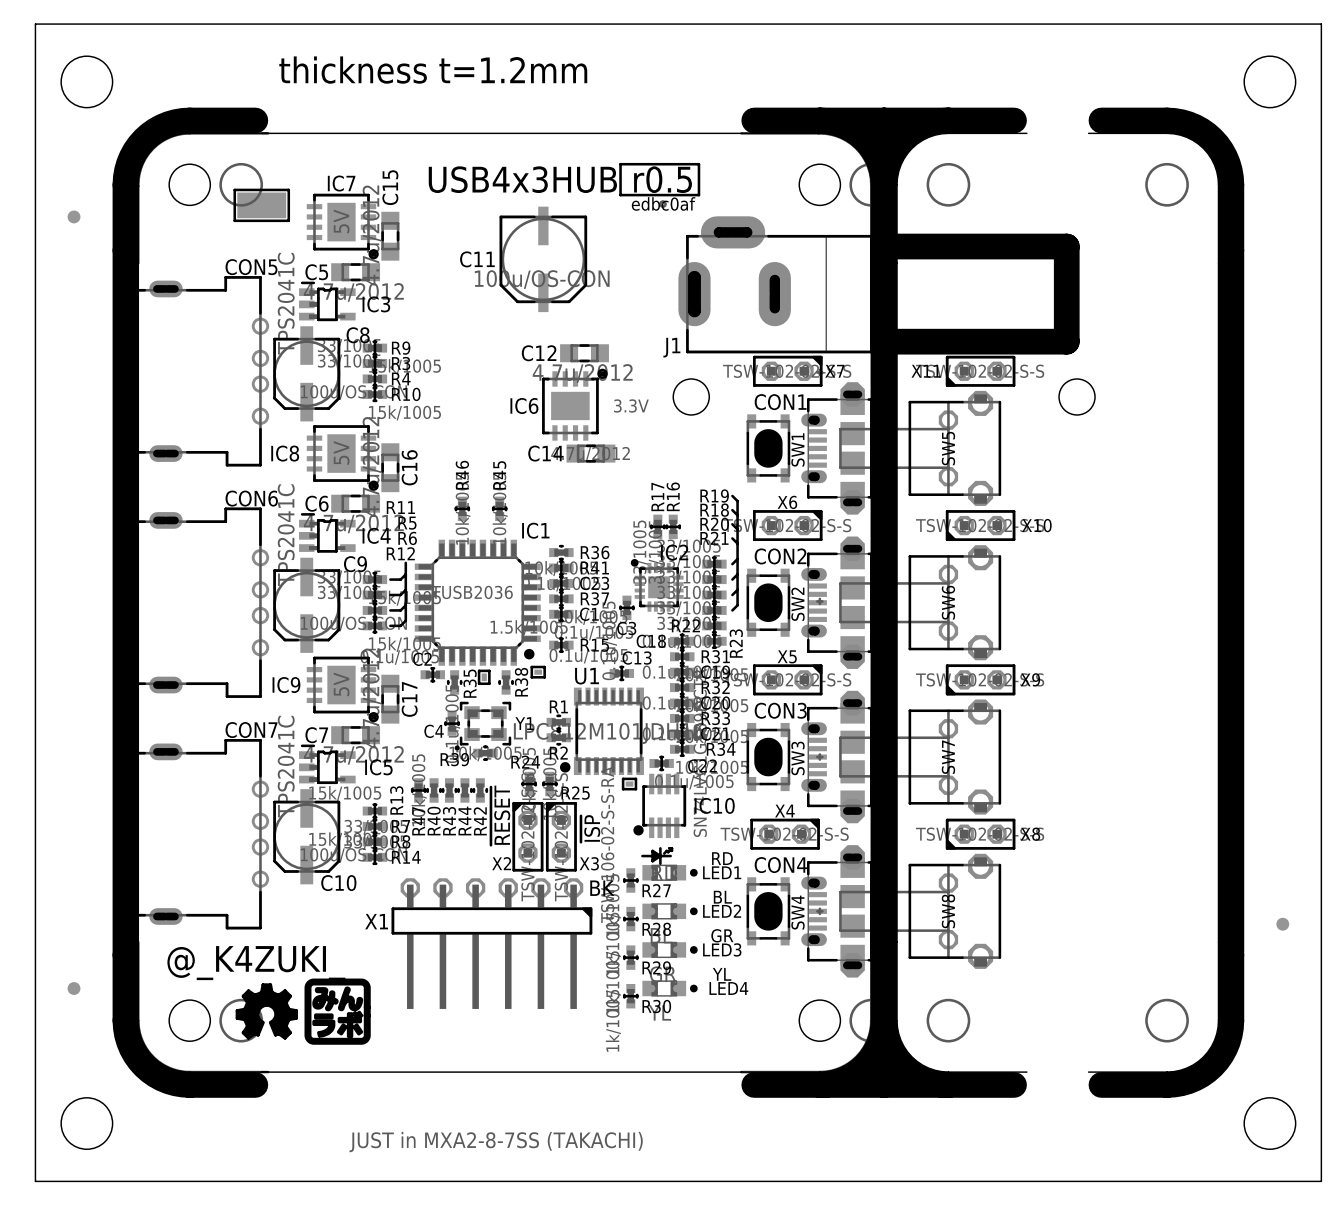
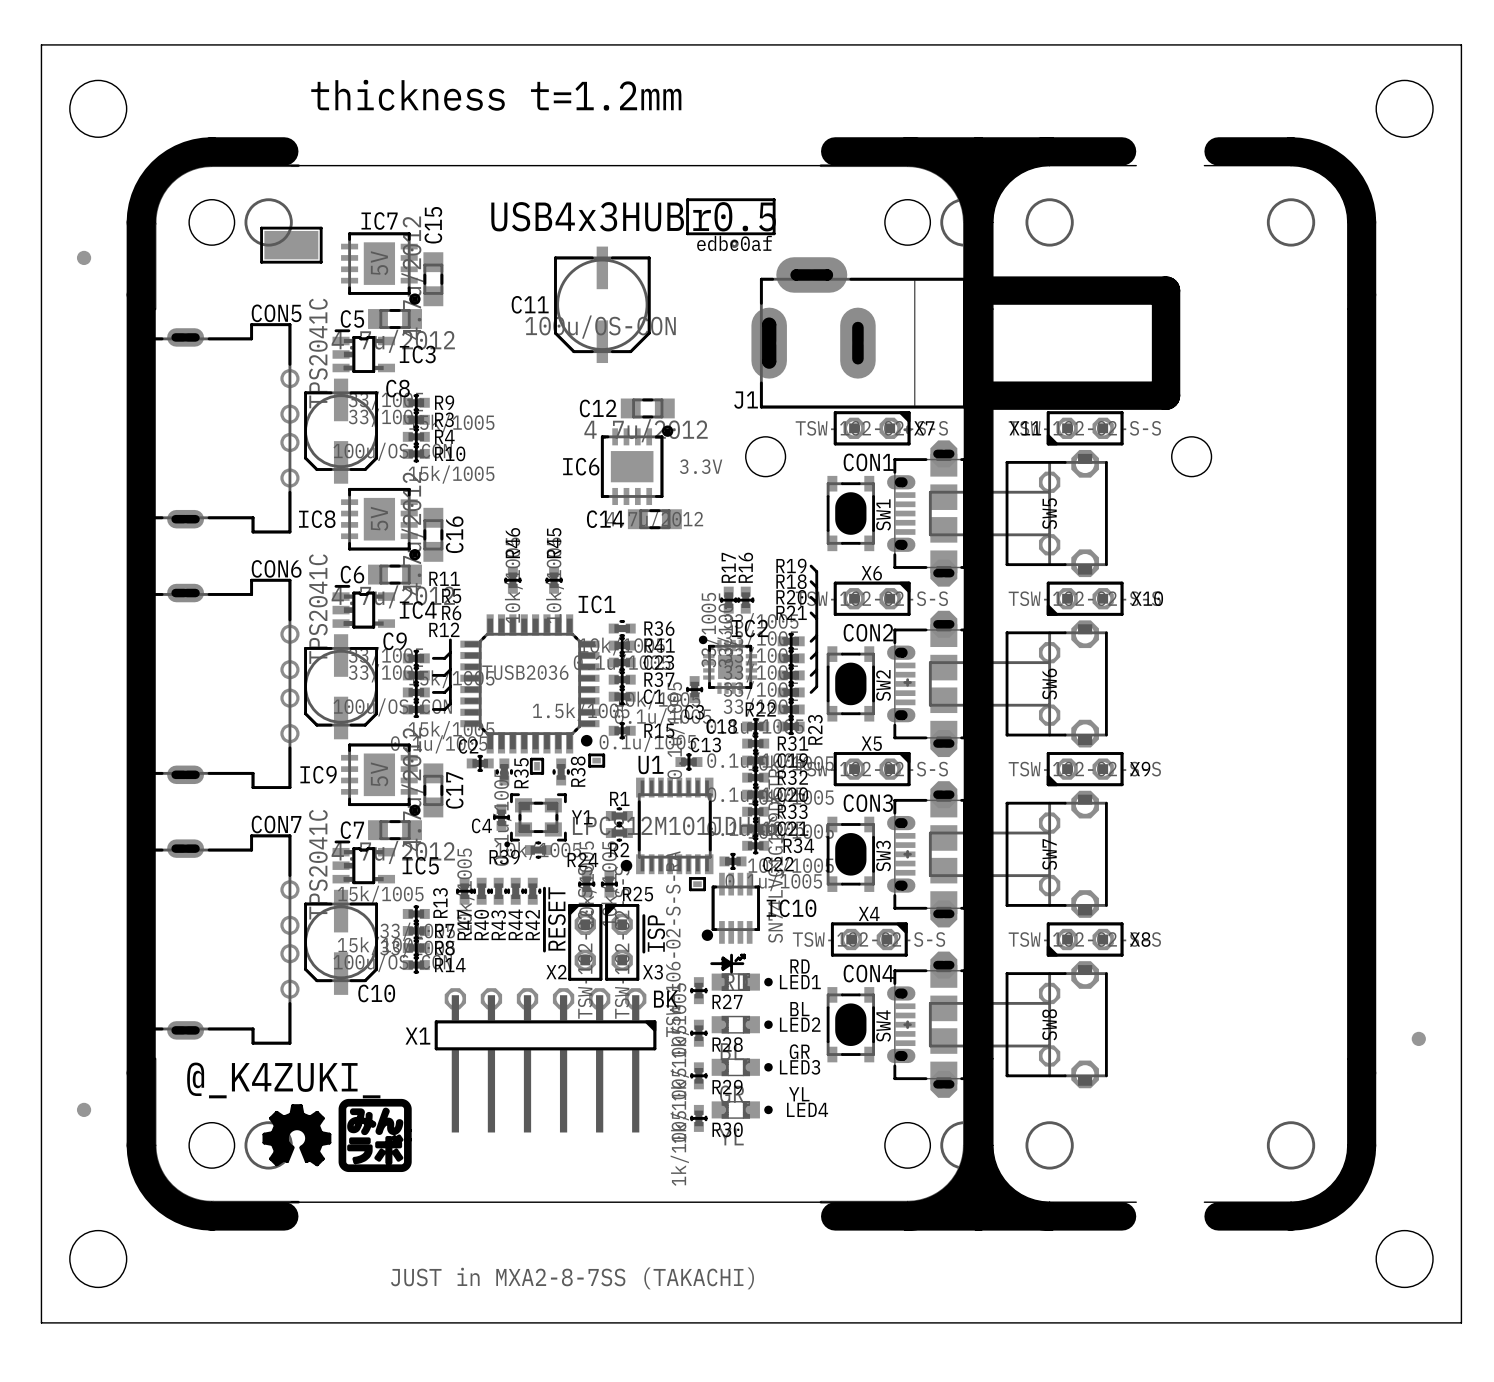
board edge: (1053, 246) (1066, 246) (1066, 341) (1053, 341) -> (1166, 290) (1166, 395)

